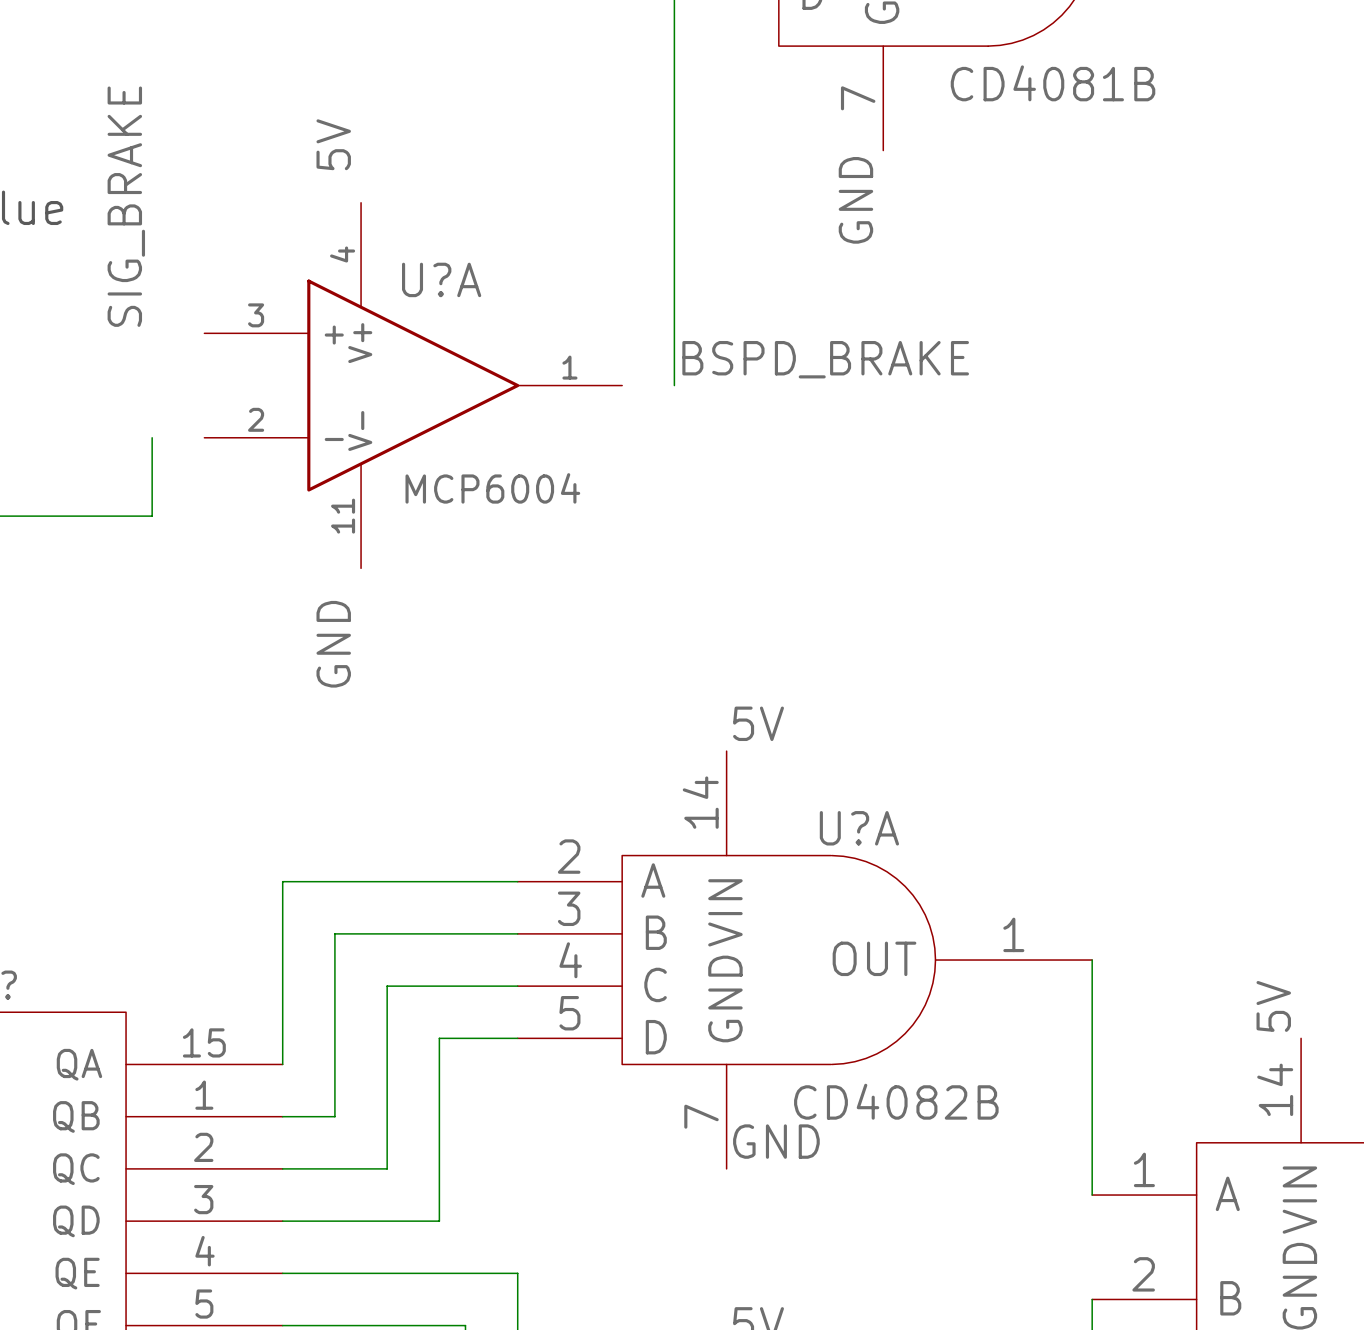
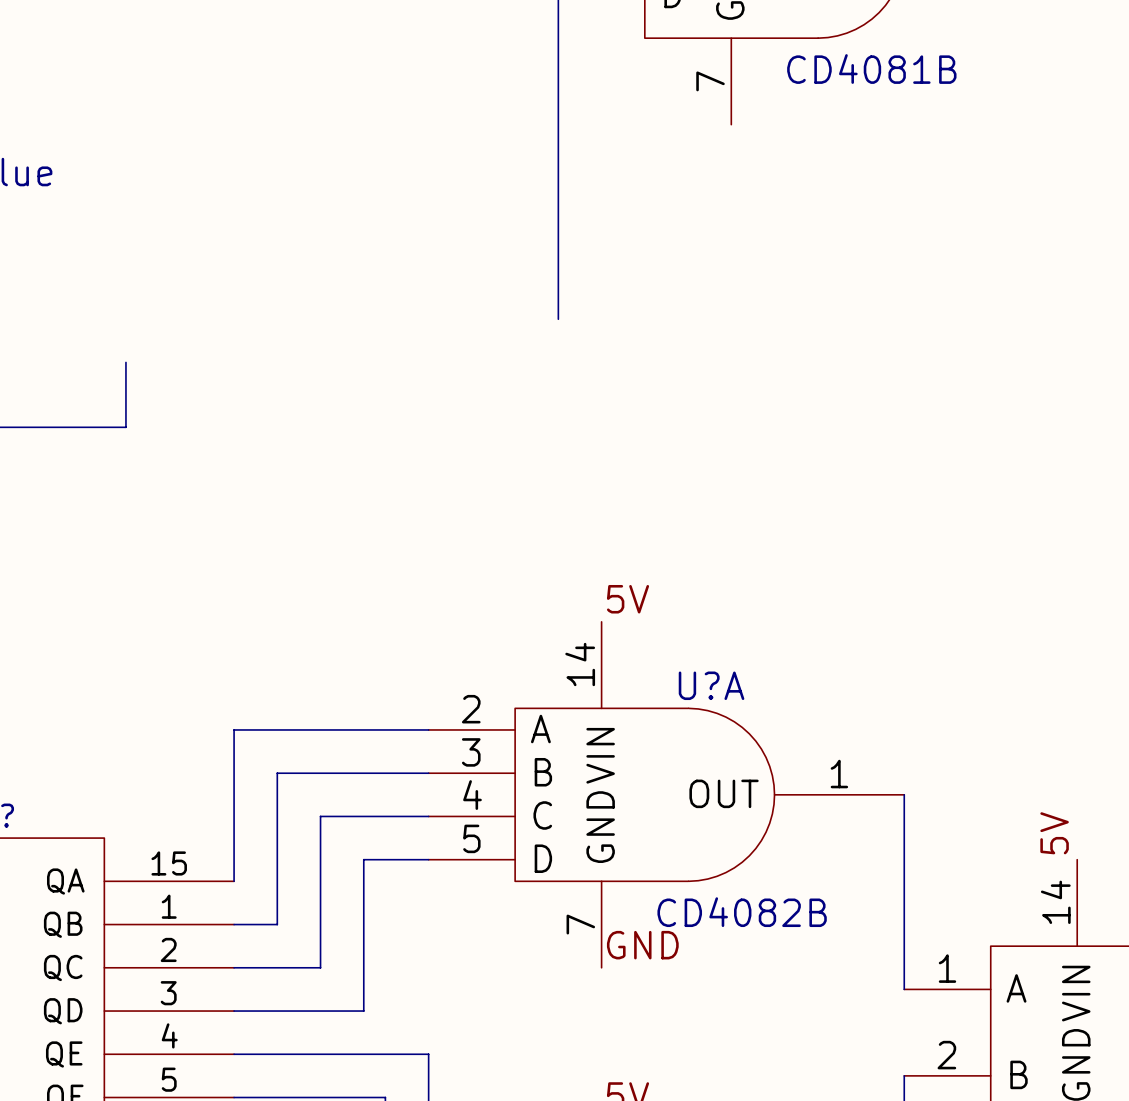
label: 5V (333, 144) -> none
label: GND (855, 200) -> none
label: SIG_BRAKE (126, 206) -> none
label: BSPD_BRAKE (825, 359) -> none
U?A: MCP6004 (413, 385) -> none
label: GND (333, 644) -> none

